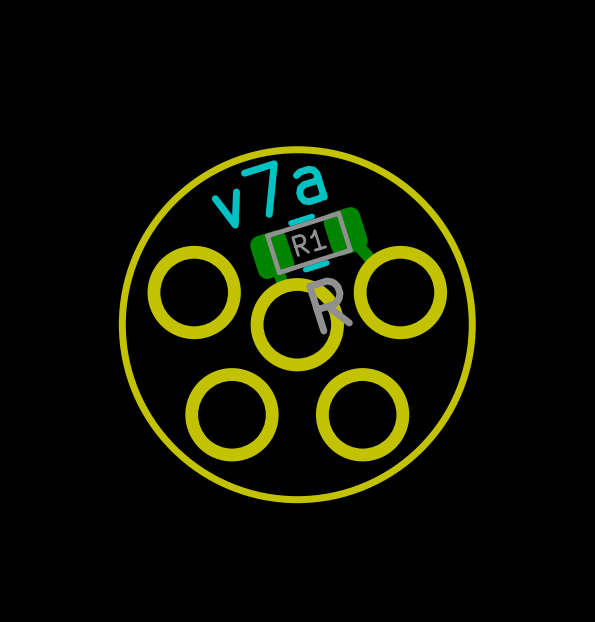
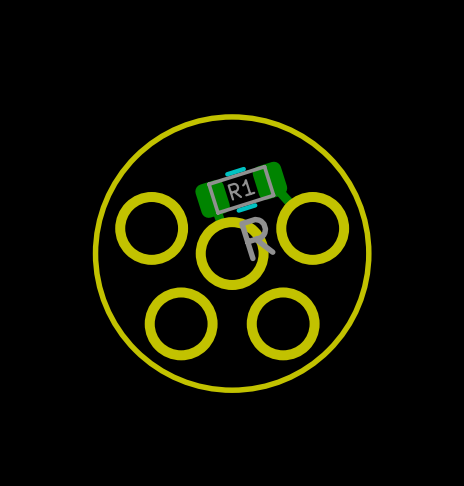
text: v7a (269, 194) -> none

